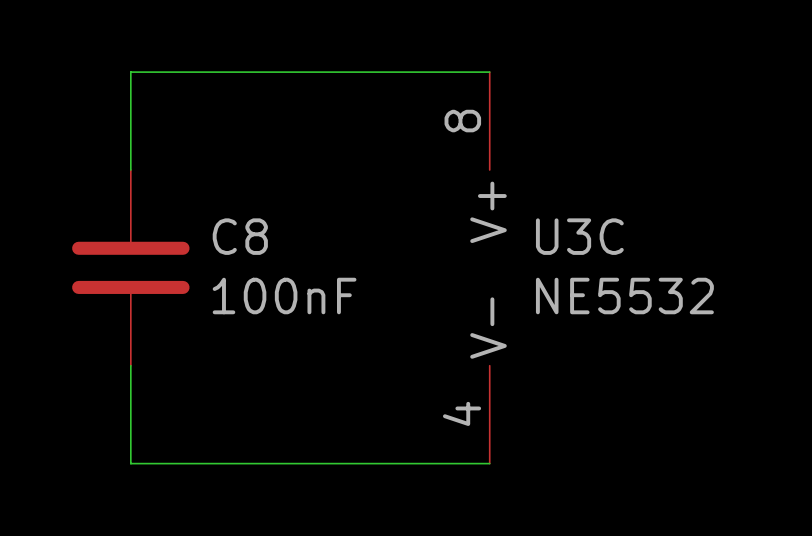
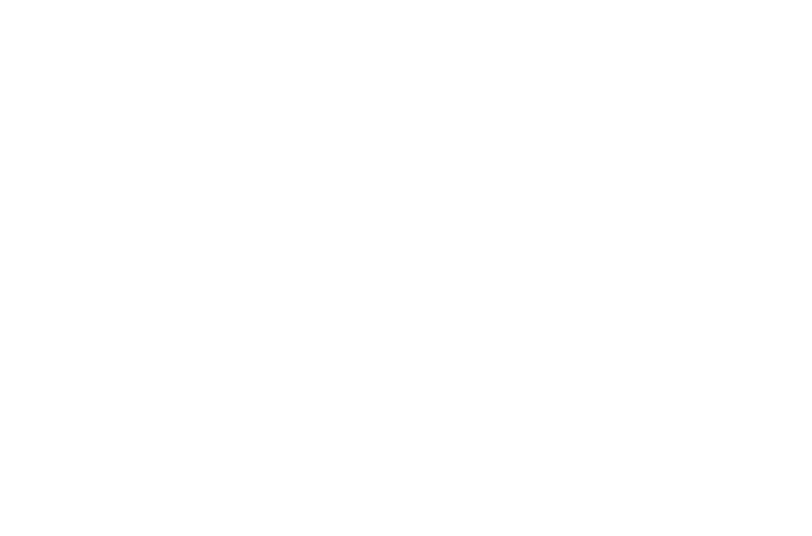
wire: (489, 72) (130, 72) (130, 169) -> none
C8: 100nF (130, 267) -> none
U3C: NE5532 (489, 267) -> none
wire: (130, 365) (130, 463) (489, 463) -> none

